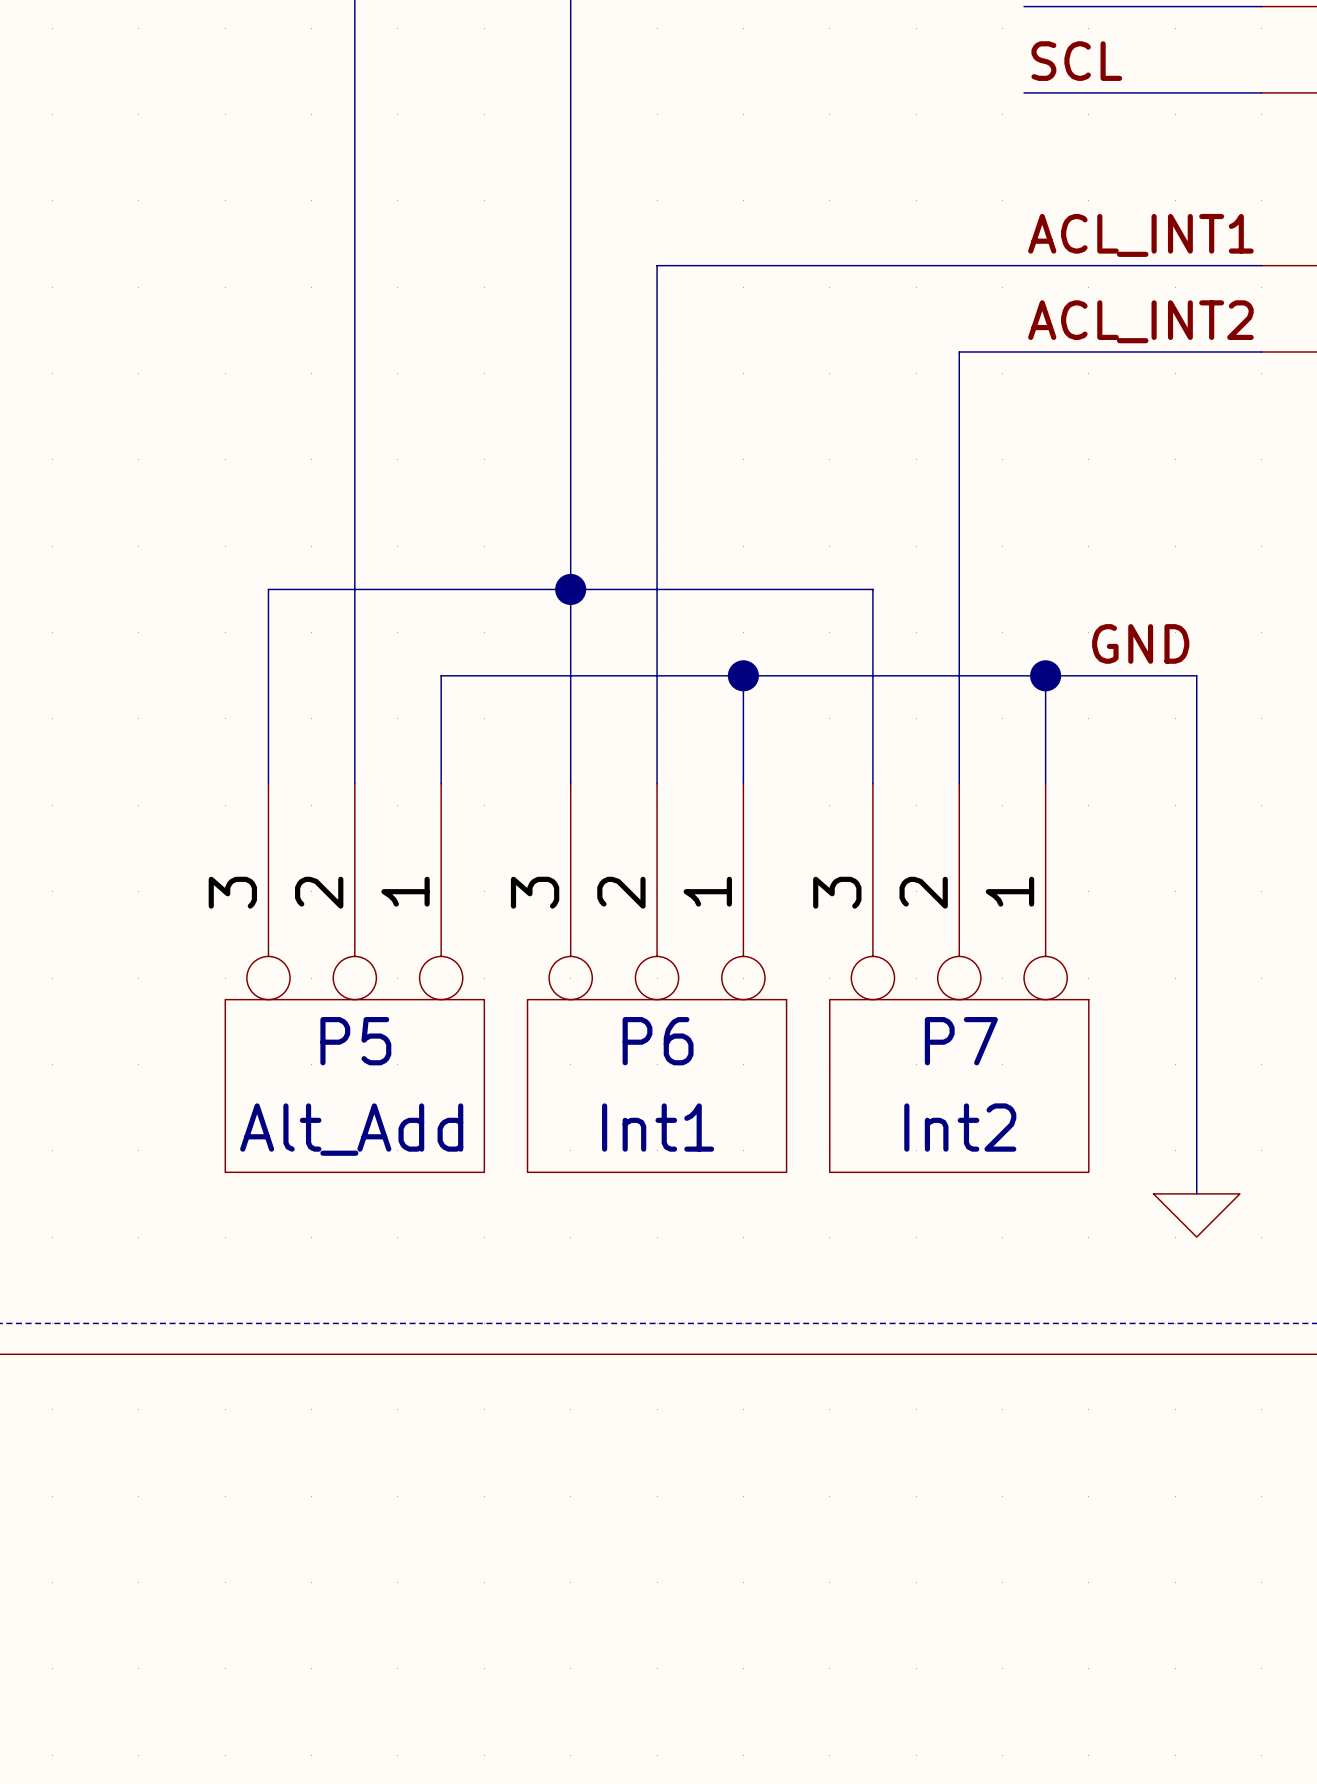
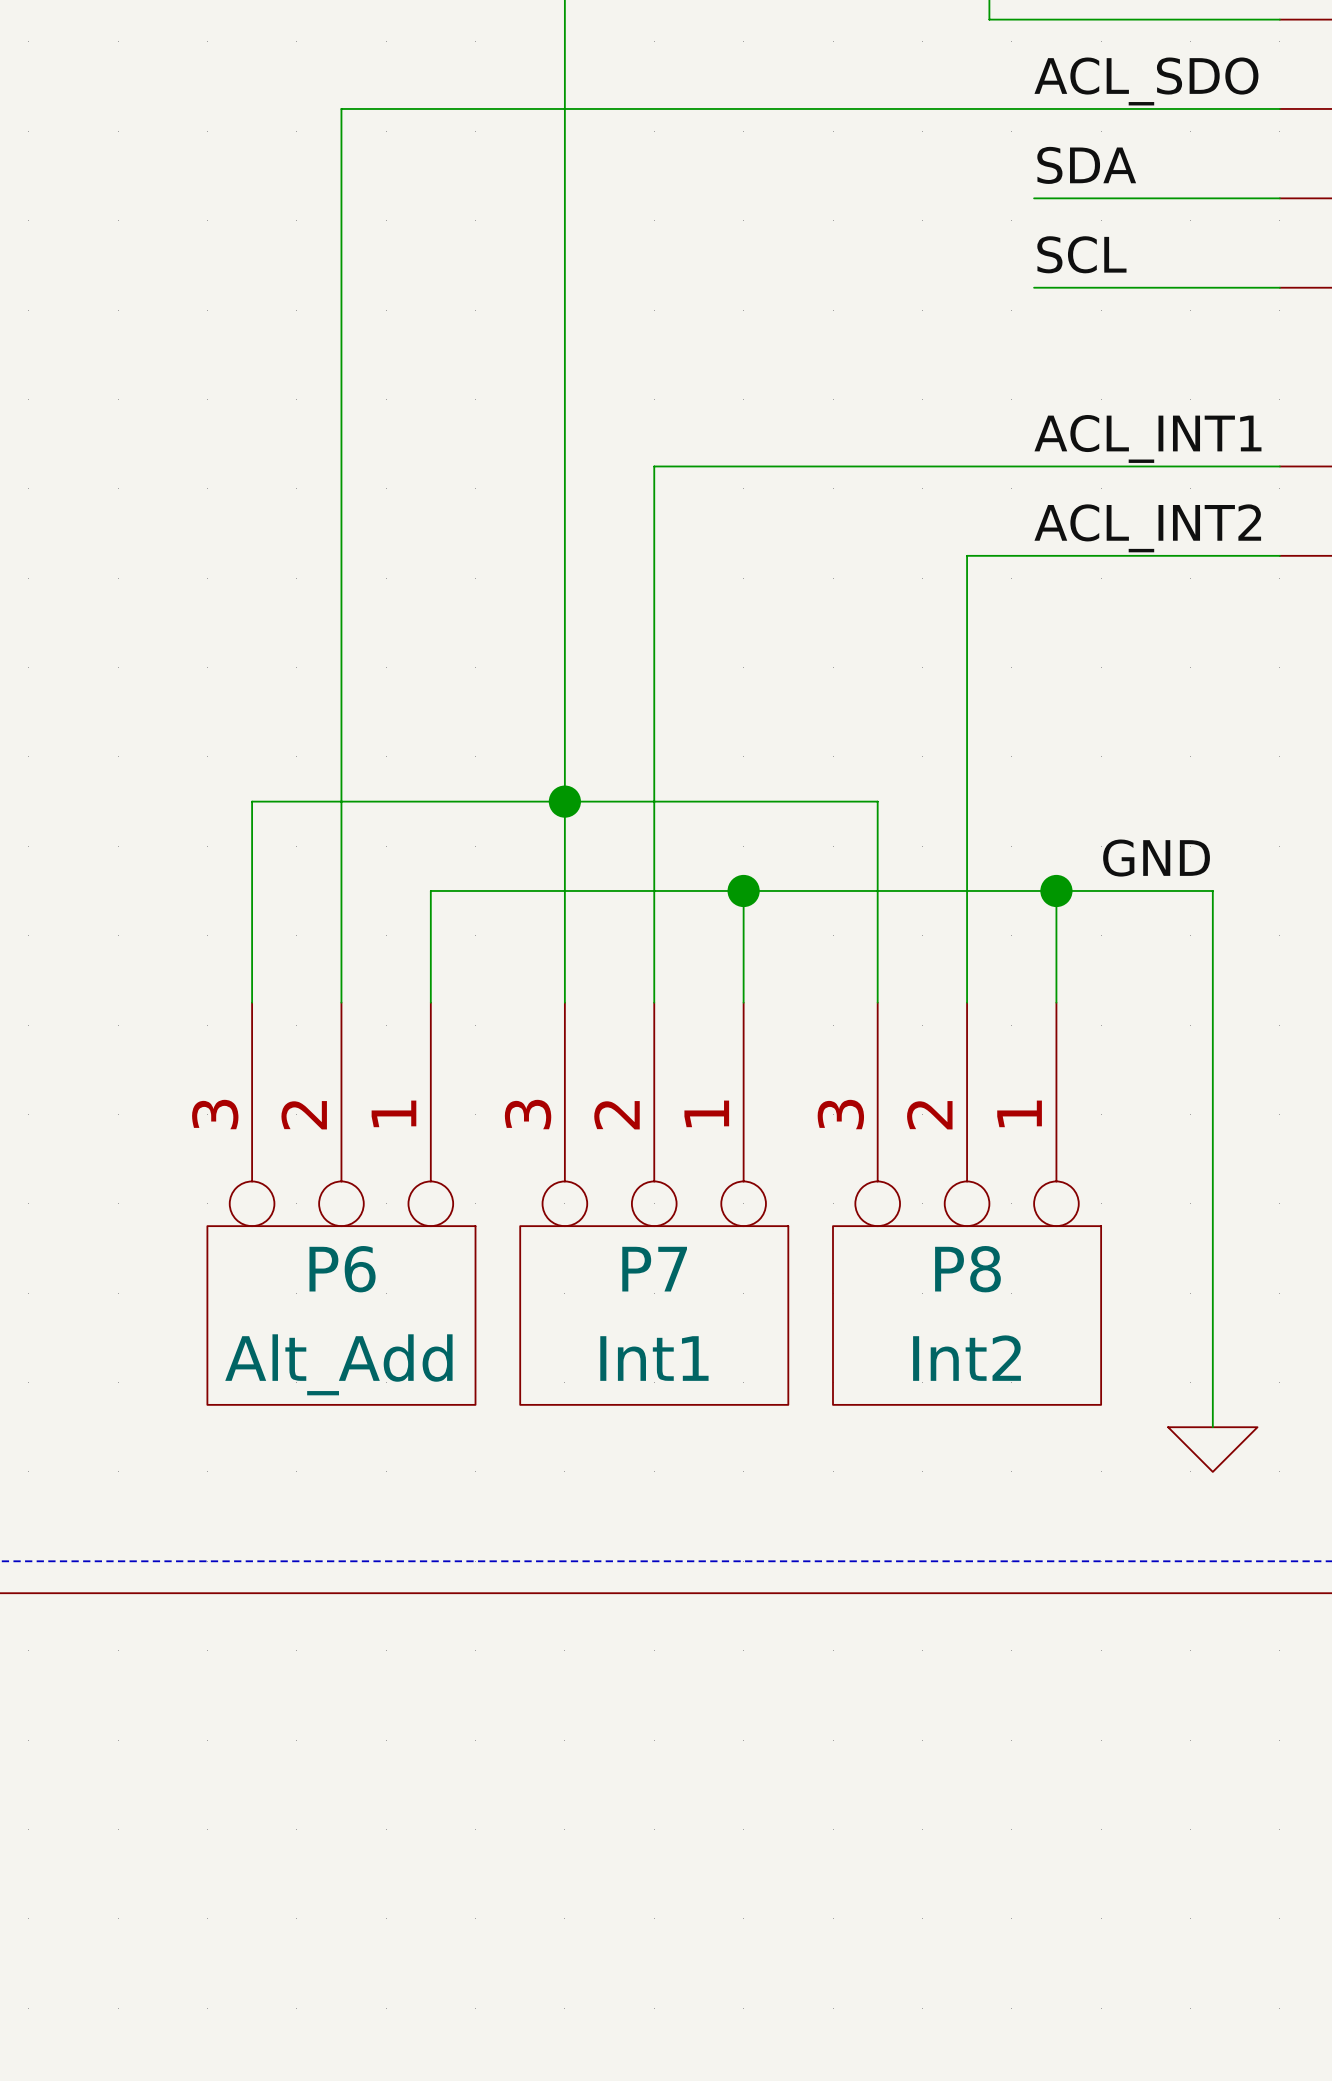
P5 name: P5 (355, 1041) -> P6 (342, 1269)
P6 name: P6 (658, 1041) -> P7 (654, 1269)
P7 name: P7 (961, 1041) -> P8 (967, 1269)

